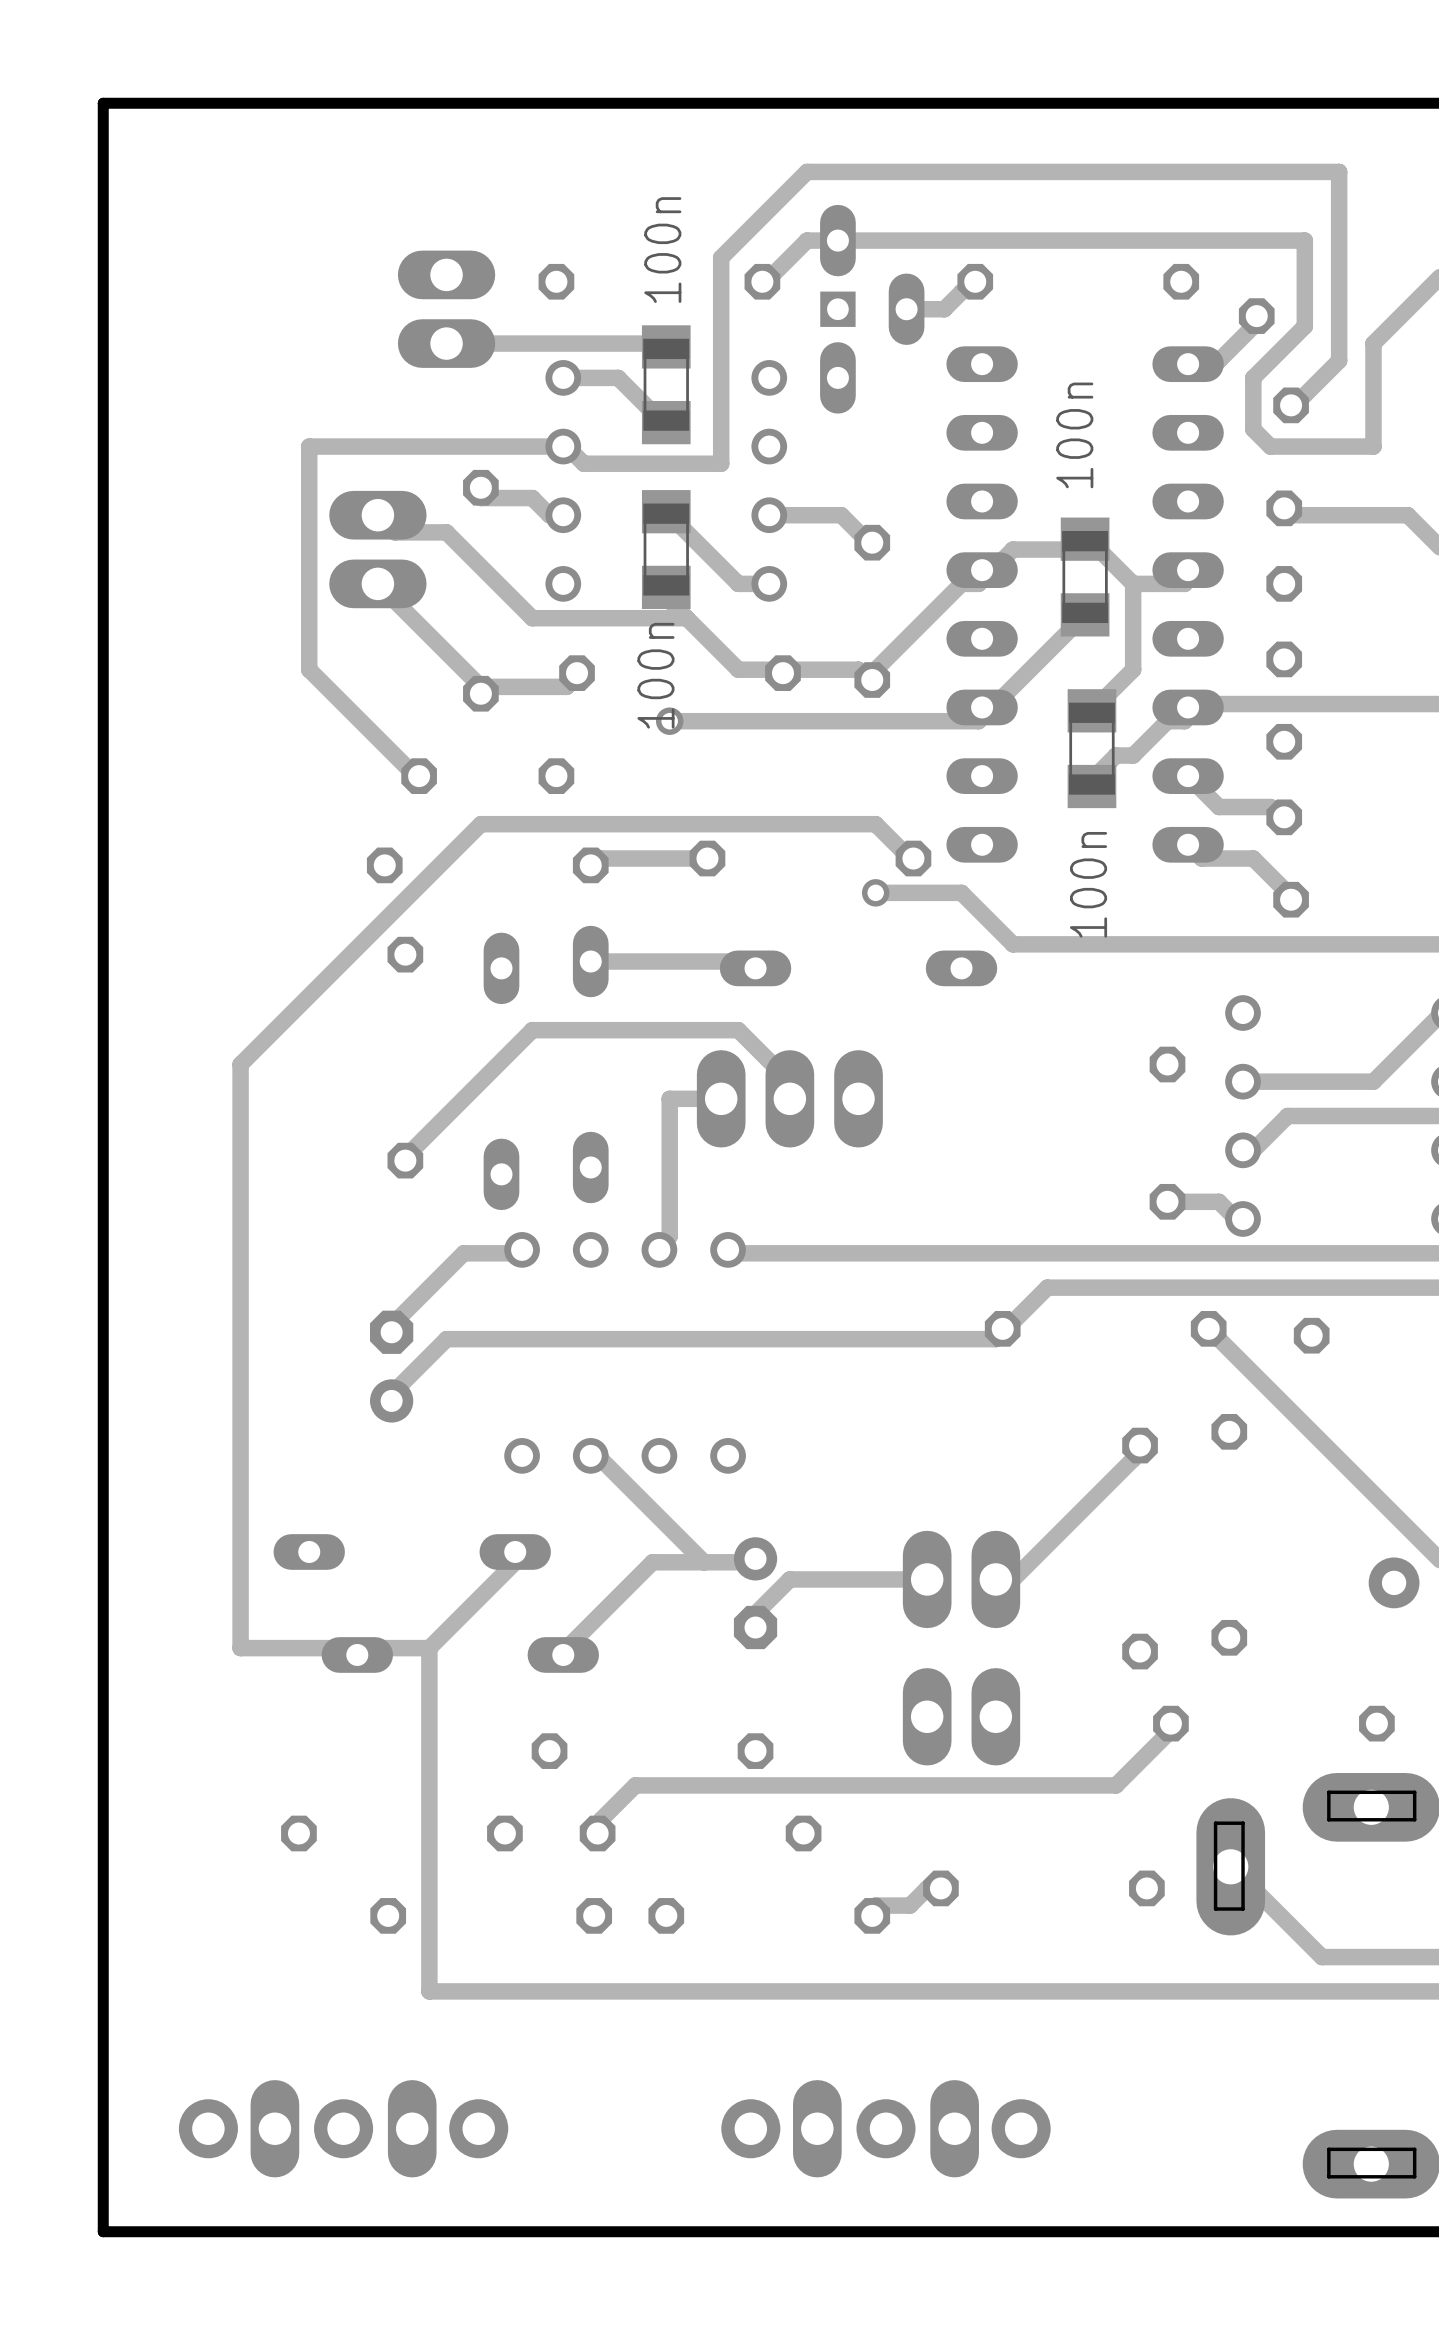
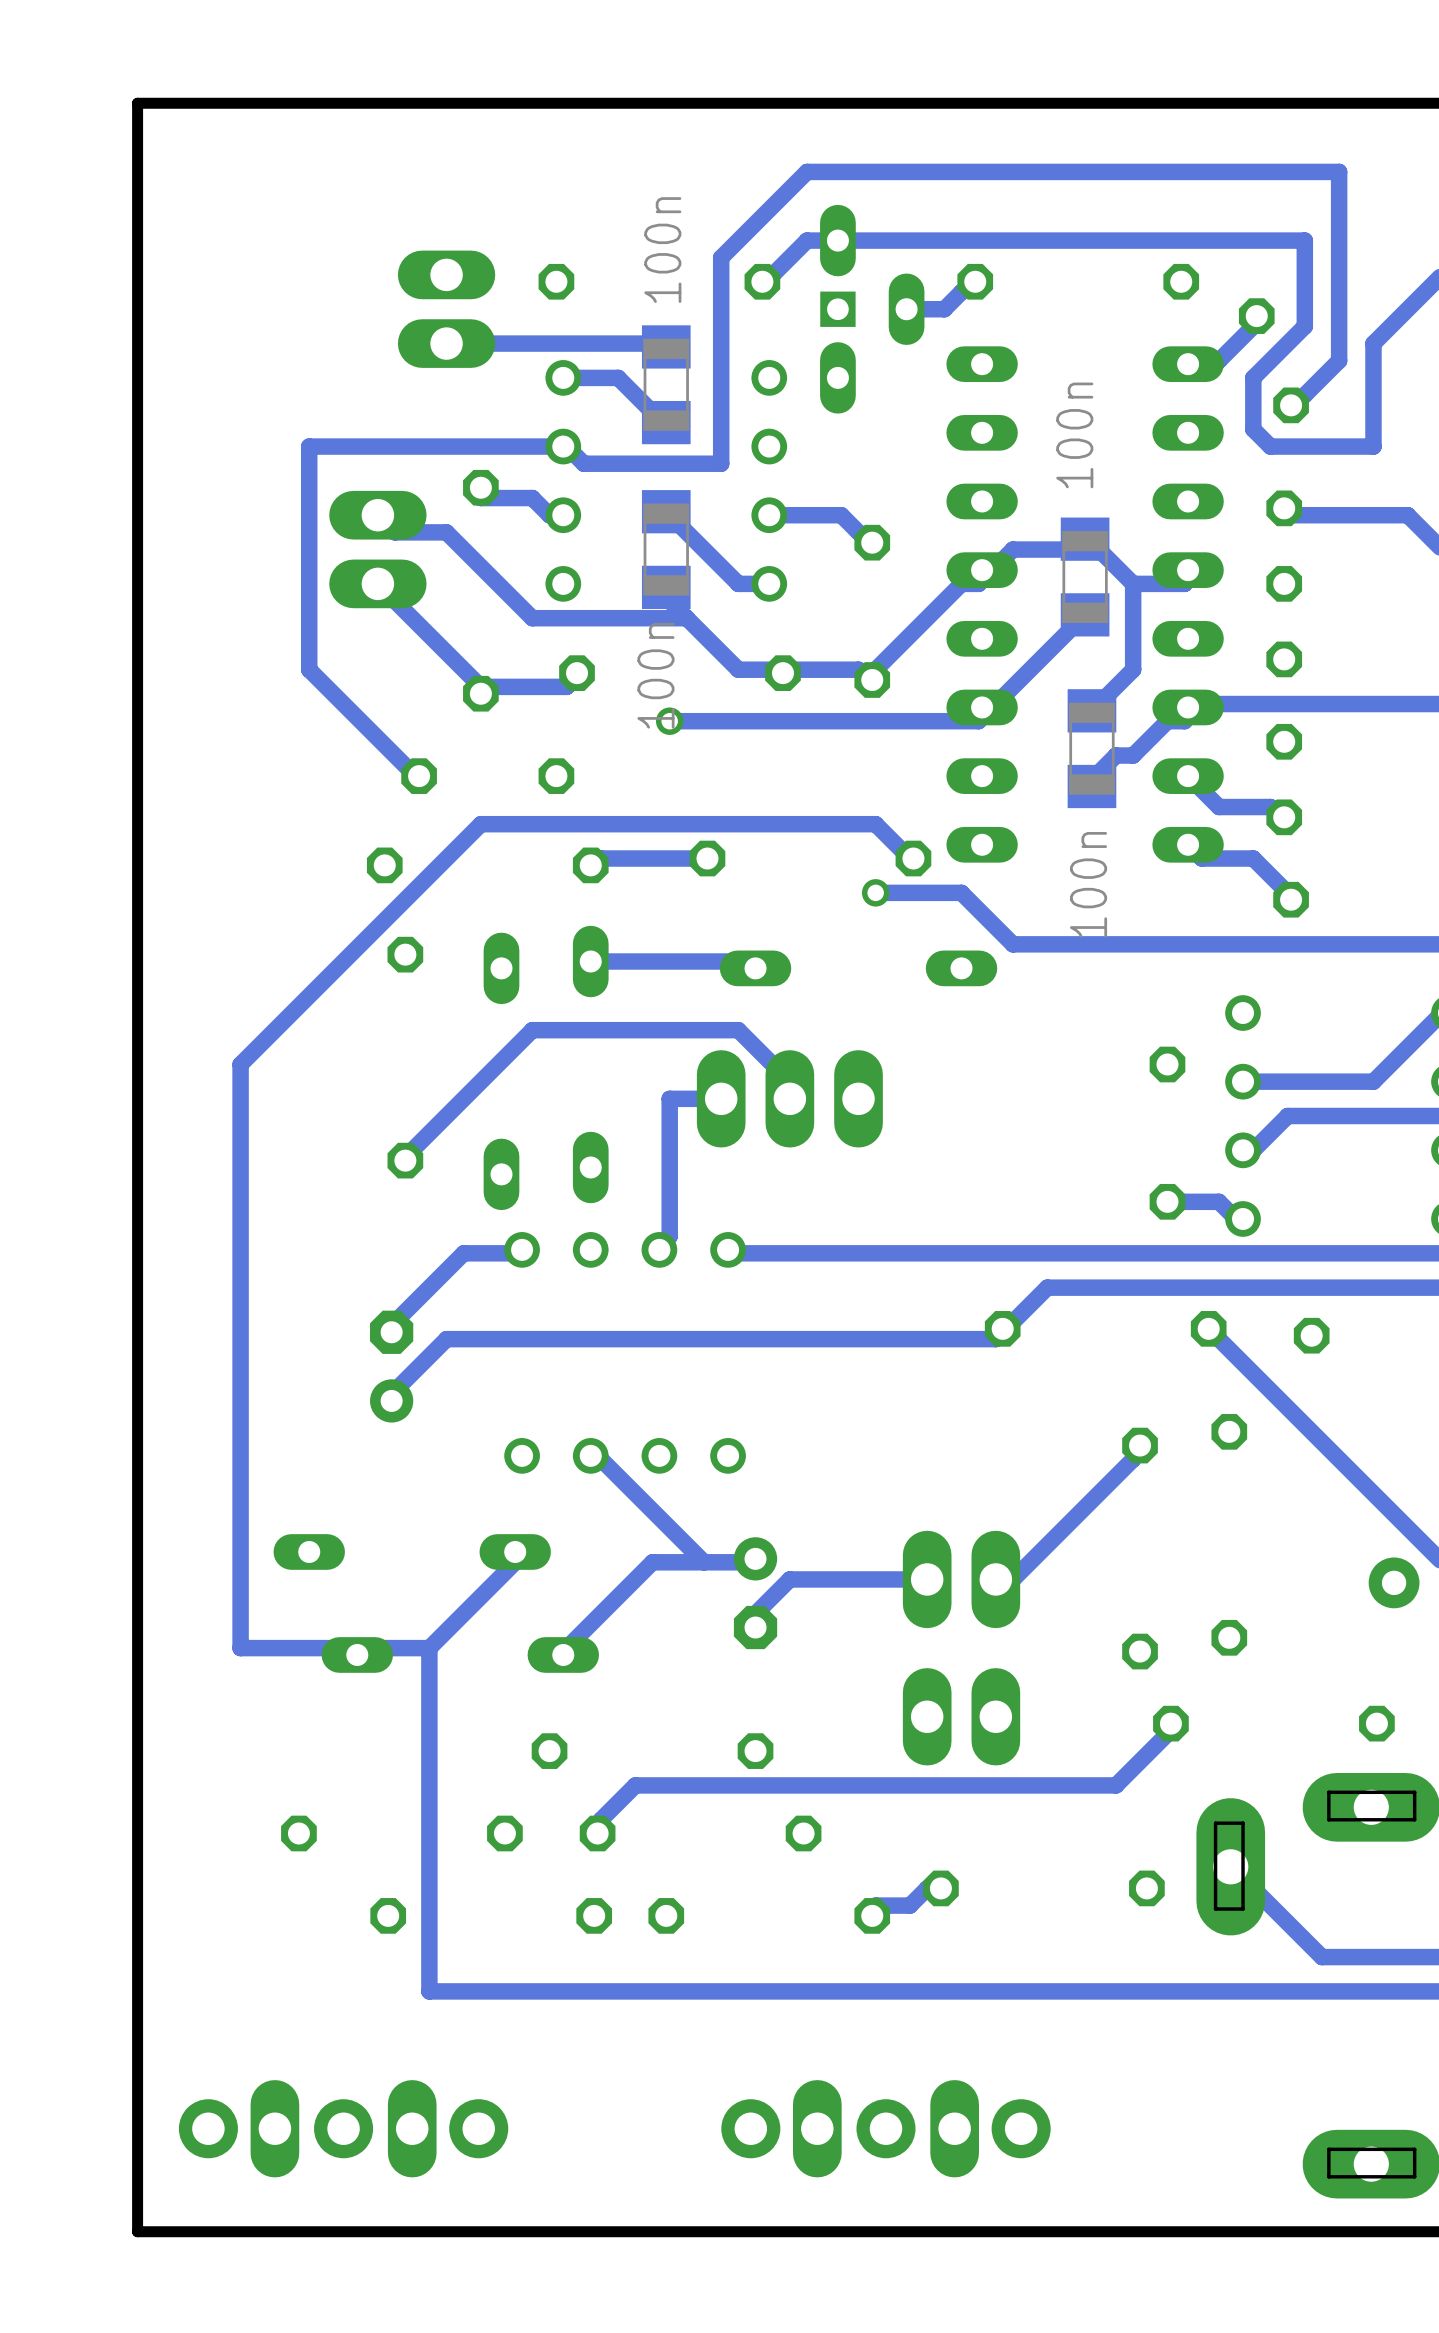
board edge: (137, 103) (103, 103) (103, 2231) (137, 2231) -> (137, 103) (137, 2231)

